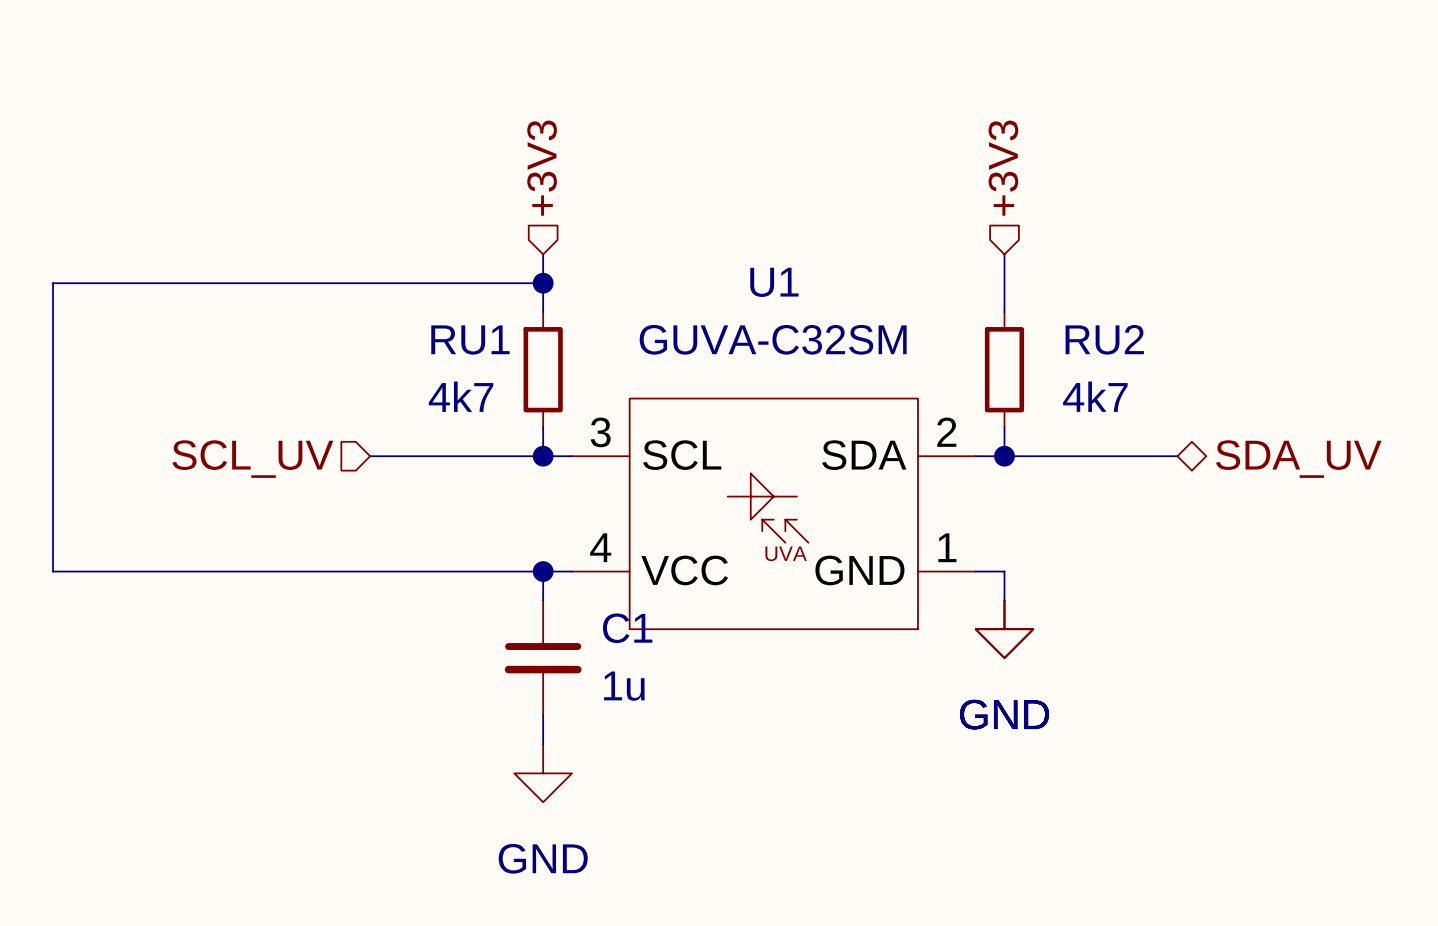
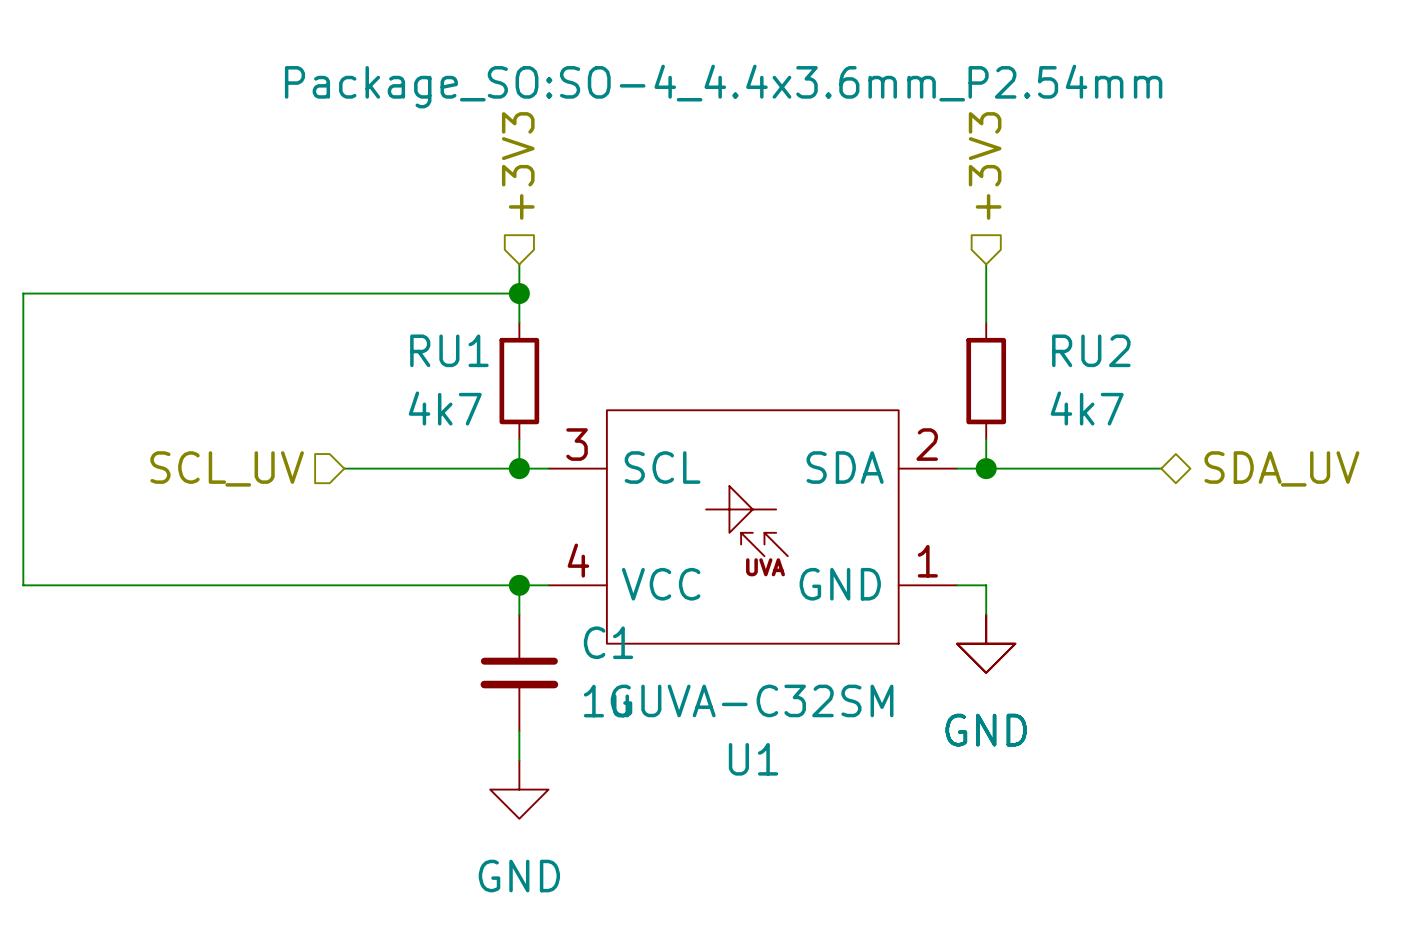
U1 text: none -> Package_SO:SO-4_4.4x3.6mm_P2.54mm (723, 86)
U1 name position: U1 (774, 282) -> U1 (753, 759)
U1 value position: GUVA-C32SM (773, 339) -> GUVA-C32SM (752, 700)

